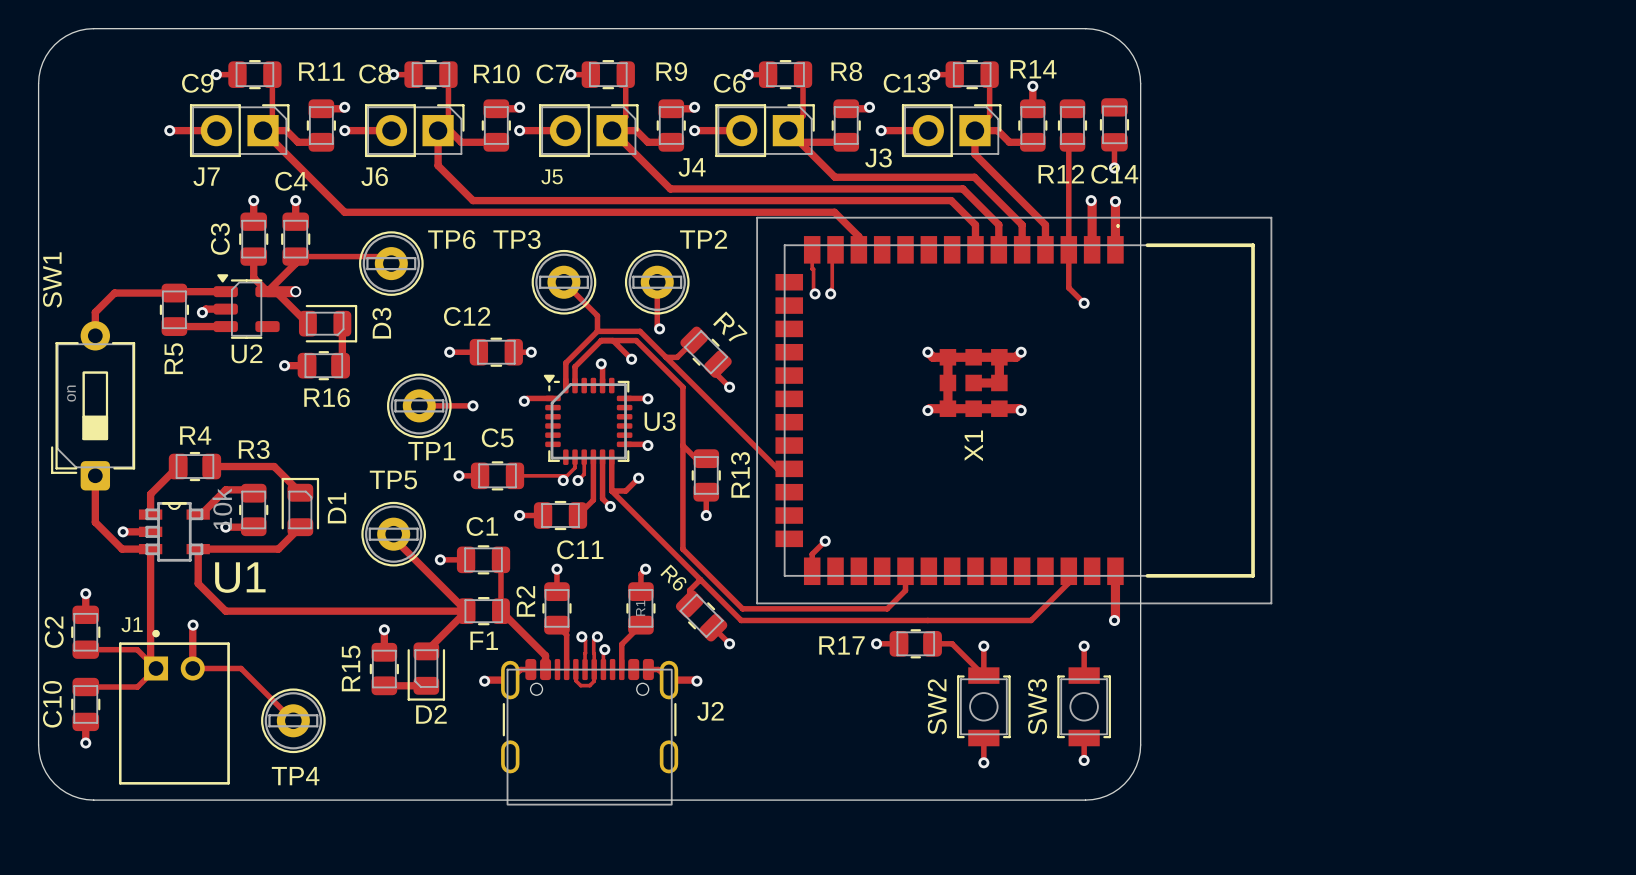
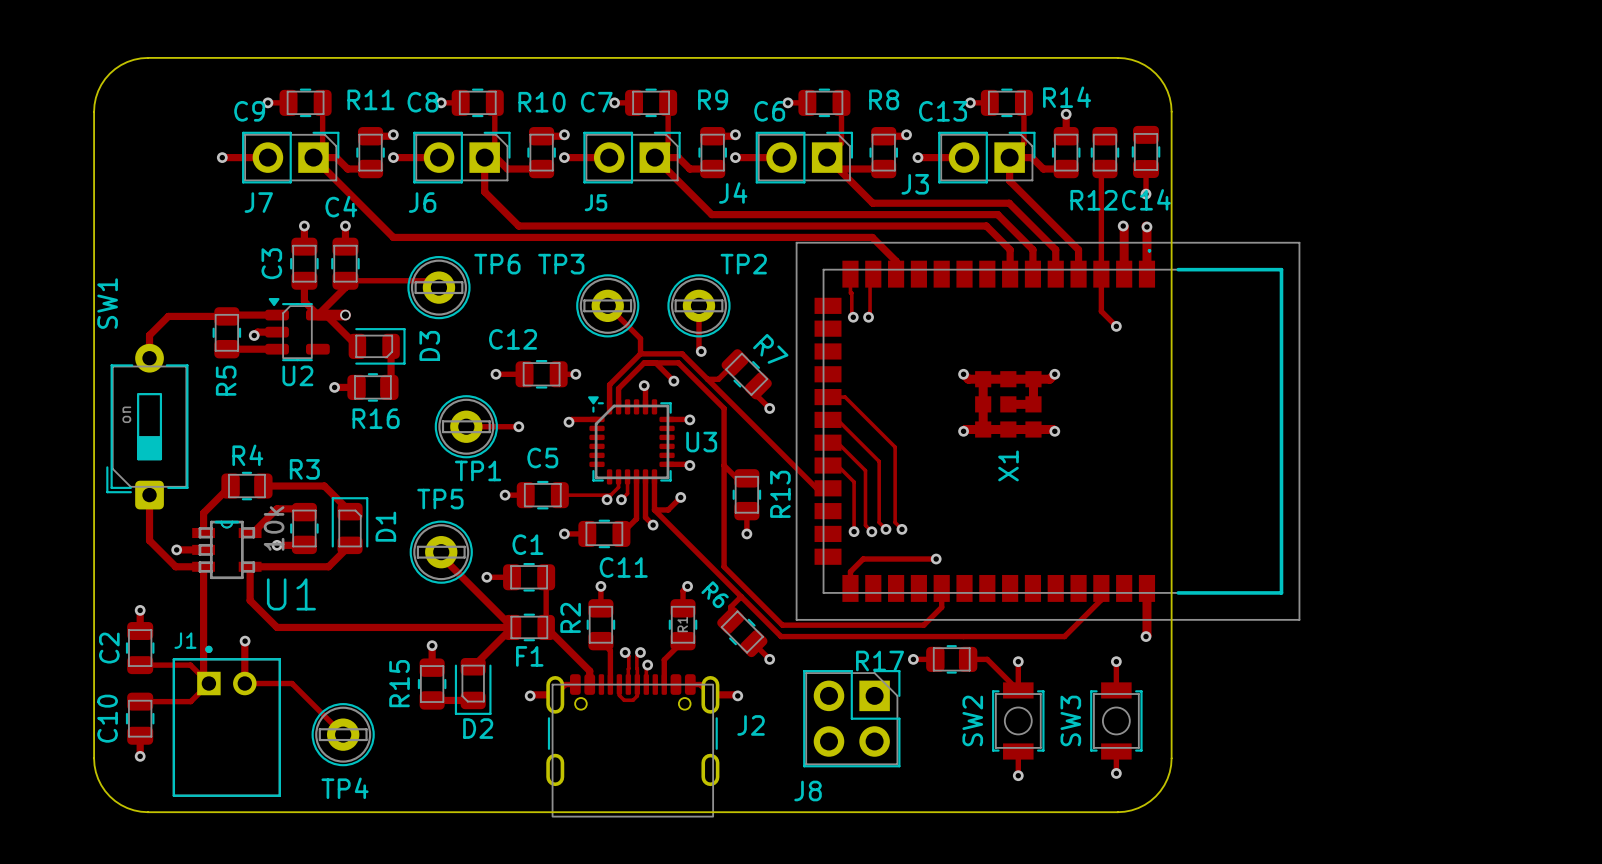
track: none -> (828, 397) (845, 397) (895, 447) (895, 522) (901, 529)
track: none -> (828, 419) (837, 419) (879, 461) (879, 522) (886, 529)
track: none -> (828, 442) (837, 442) (865, 470) (865, 525) (871, 531)
track: none -> (828, 465) (837, 465) (854, 482) (854, 531)
via: none -> (886, 529)
via: none -> (901, 529)
via: none -> (854, 531)
via: none -> (871, 531)
track: none -> (863, 559) (936, 559)
via: (825, 541) -> none
via: none -> (936, 559)
J8: none -> (851, 718)

